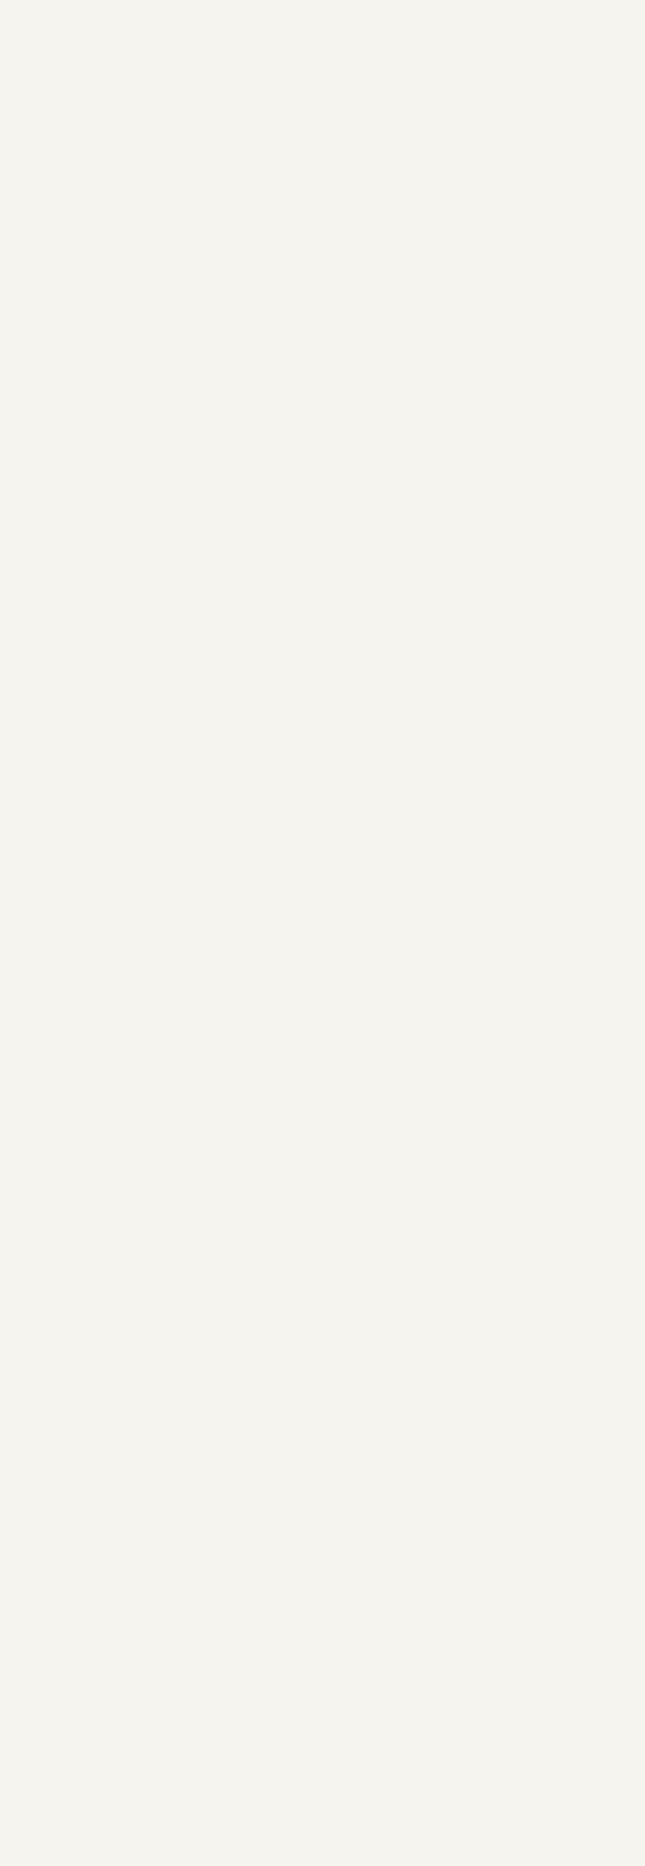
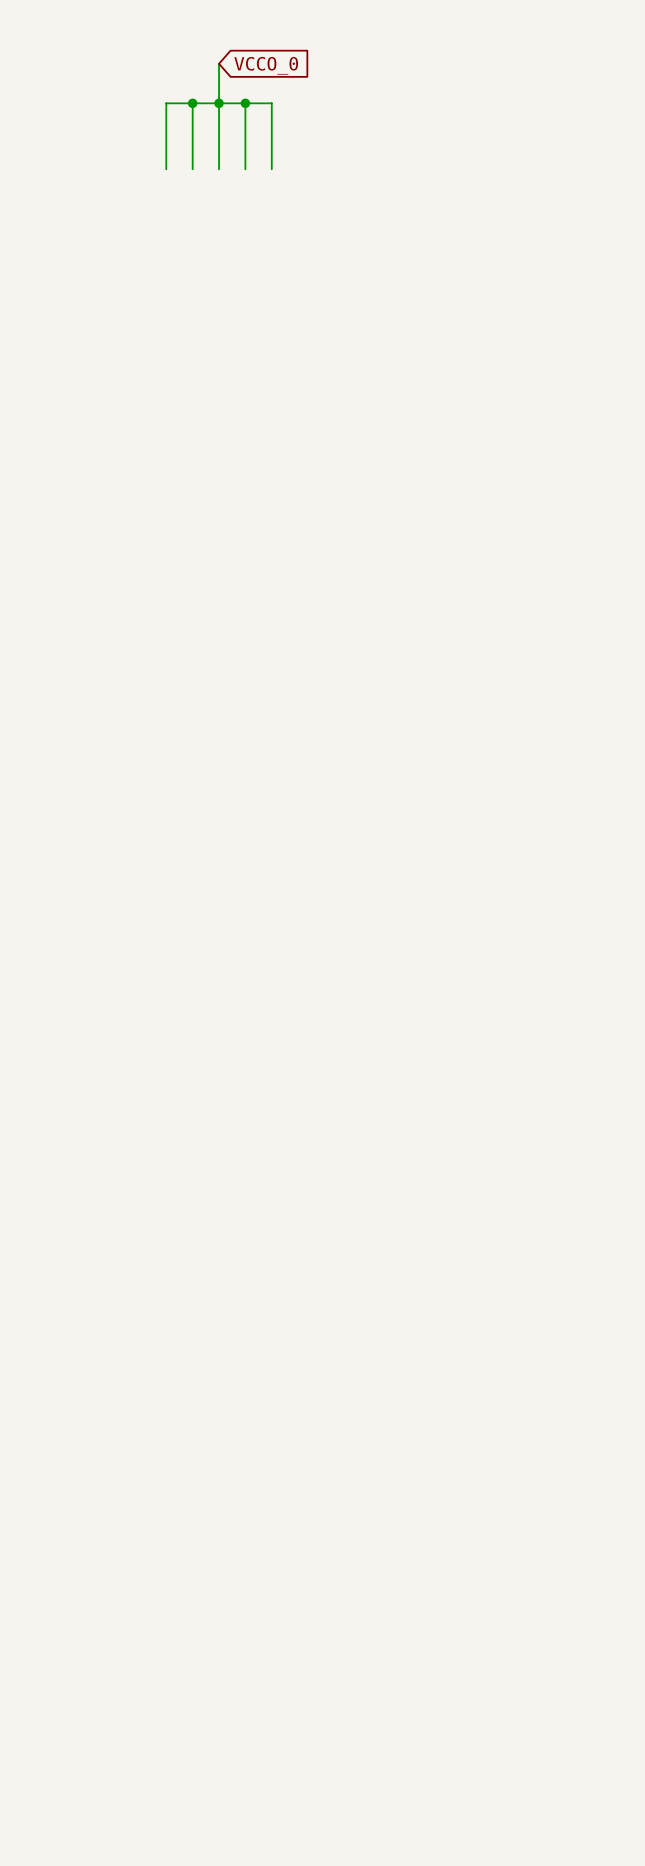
wire: none -> (219, 63) (219, 169)
global label: none -> VCCO_0 (266, 65)
wire: none -> (192, 103) (192, 169)
junction: none -> (192, 103)
junction: none -> (219, 103)
wire: none -> (245, 103) (245, 169)
junction: none -> (245, 103)
wire: none -> (166, 169) (166, 103) (271, 103) (271, 169)

